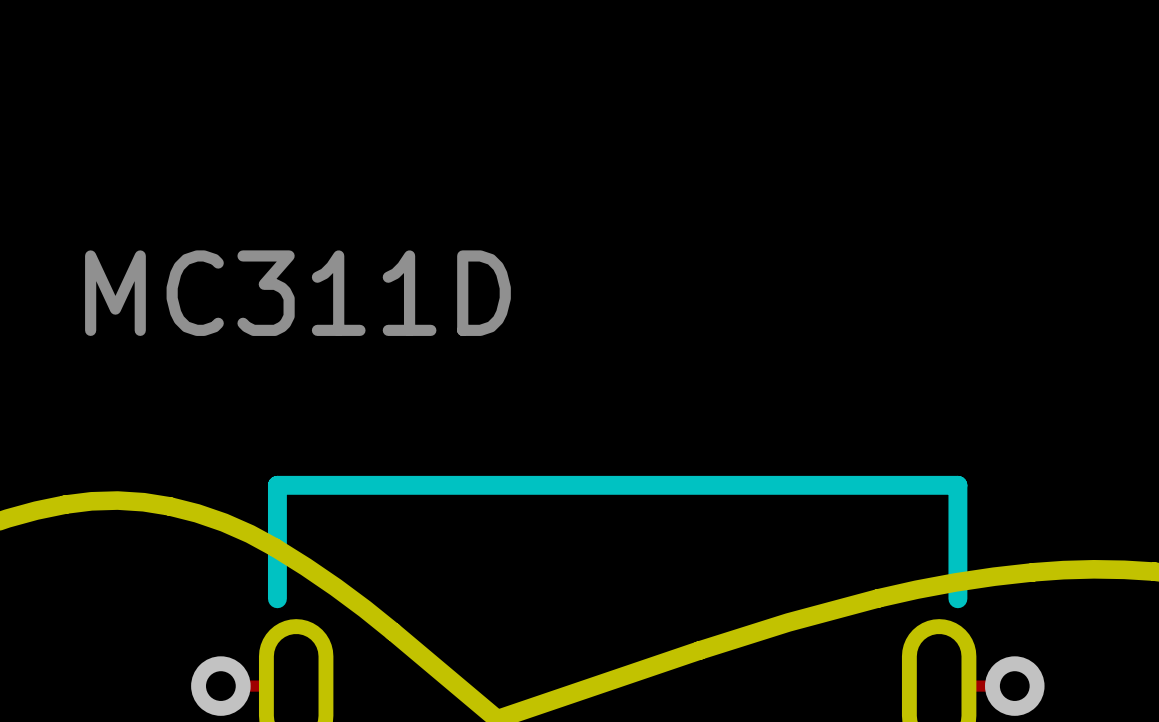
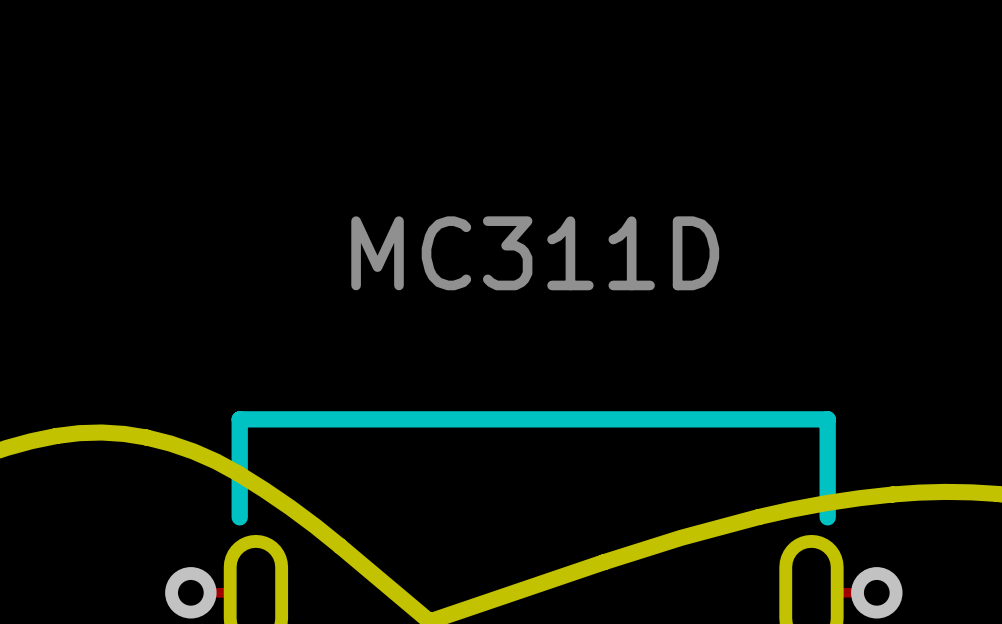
part value position: MC311D (297, 293) -> MC311D (535, 253)

